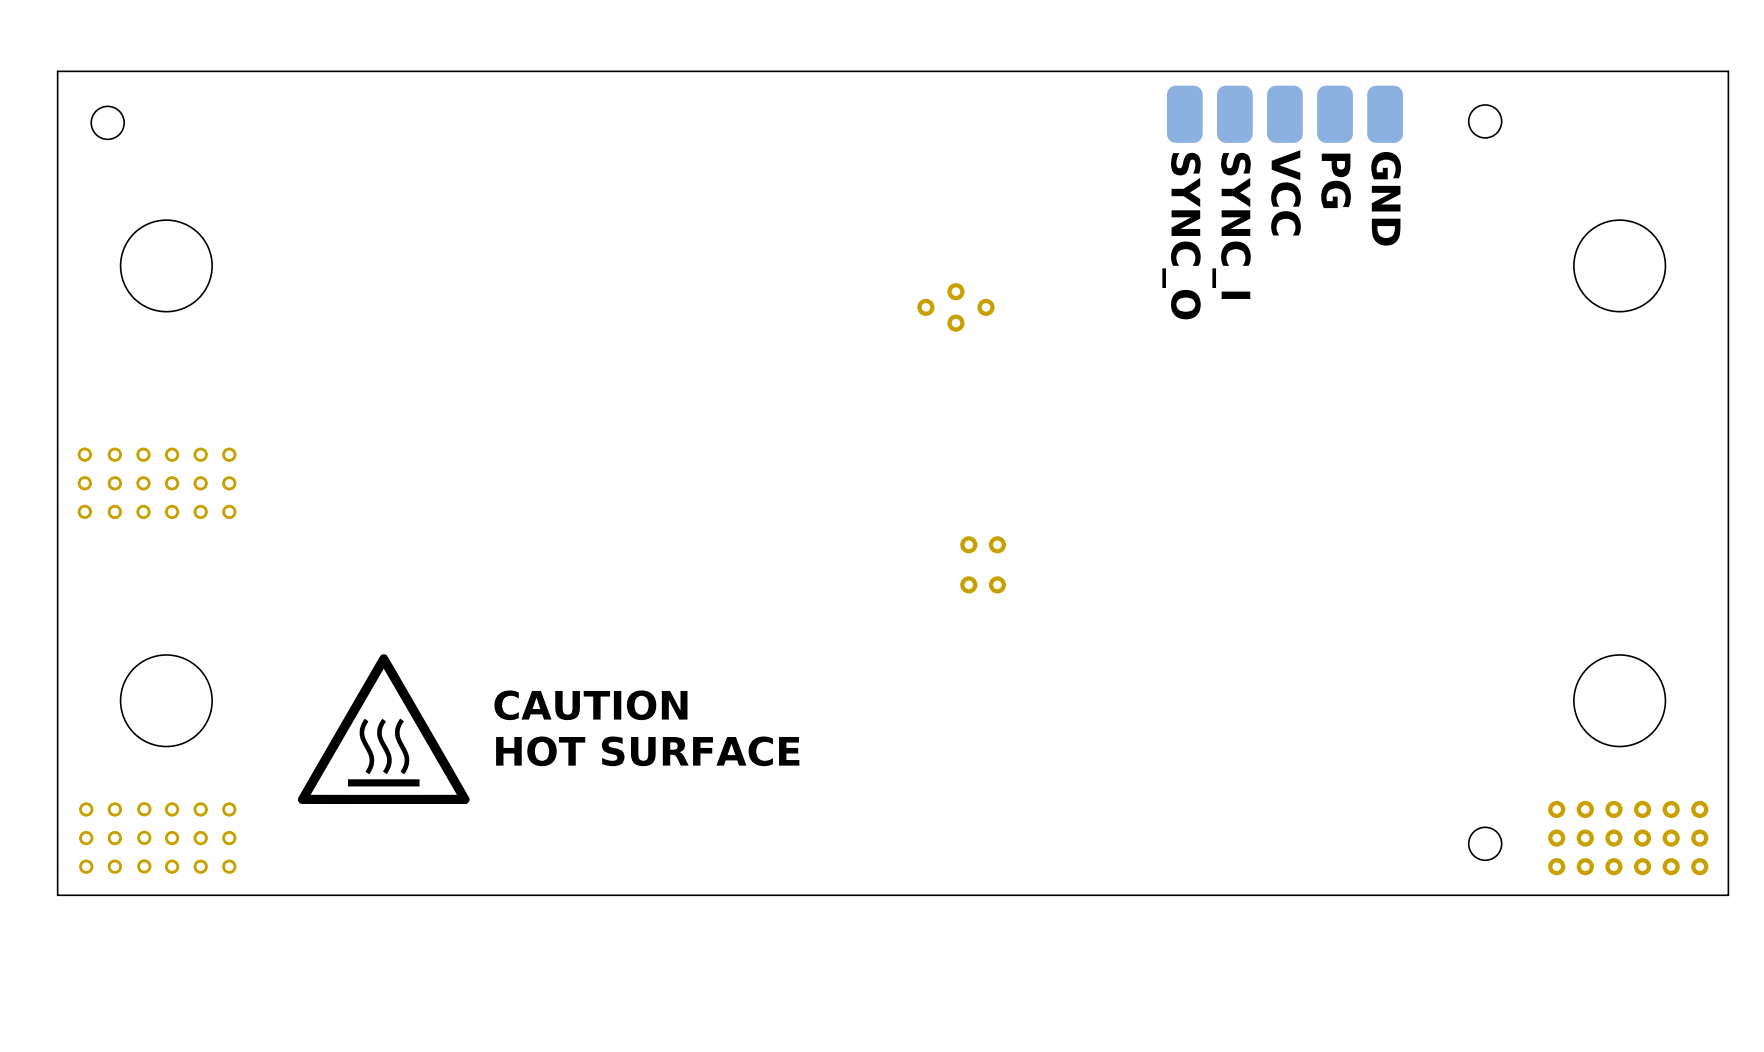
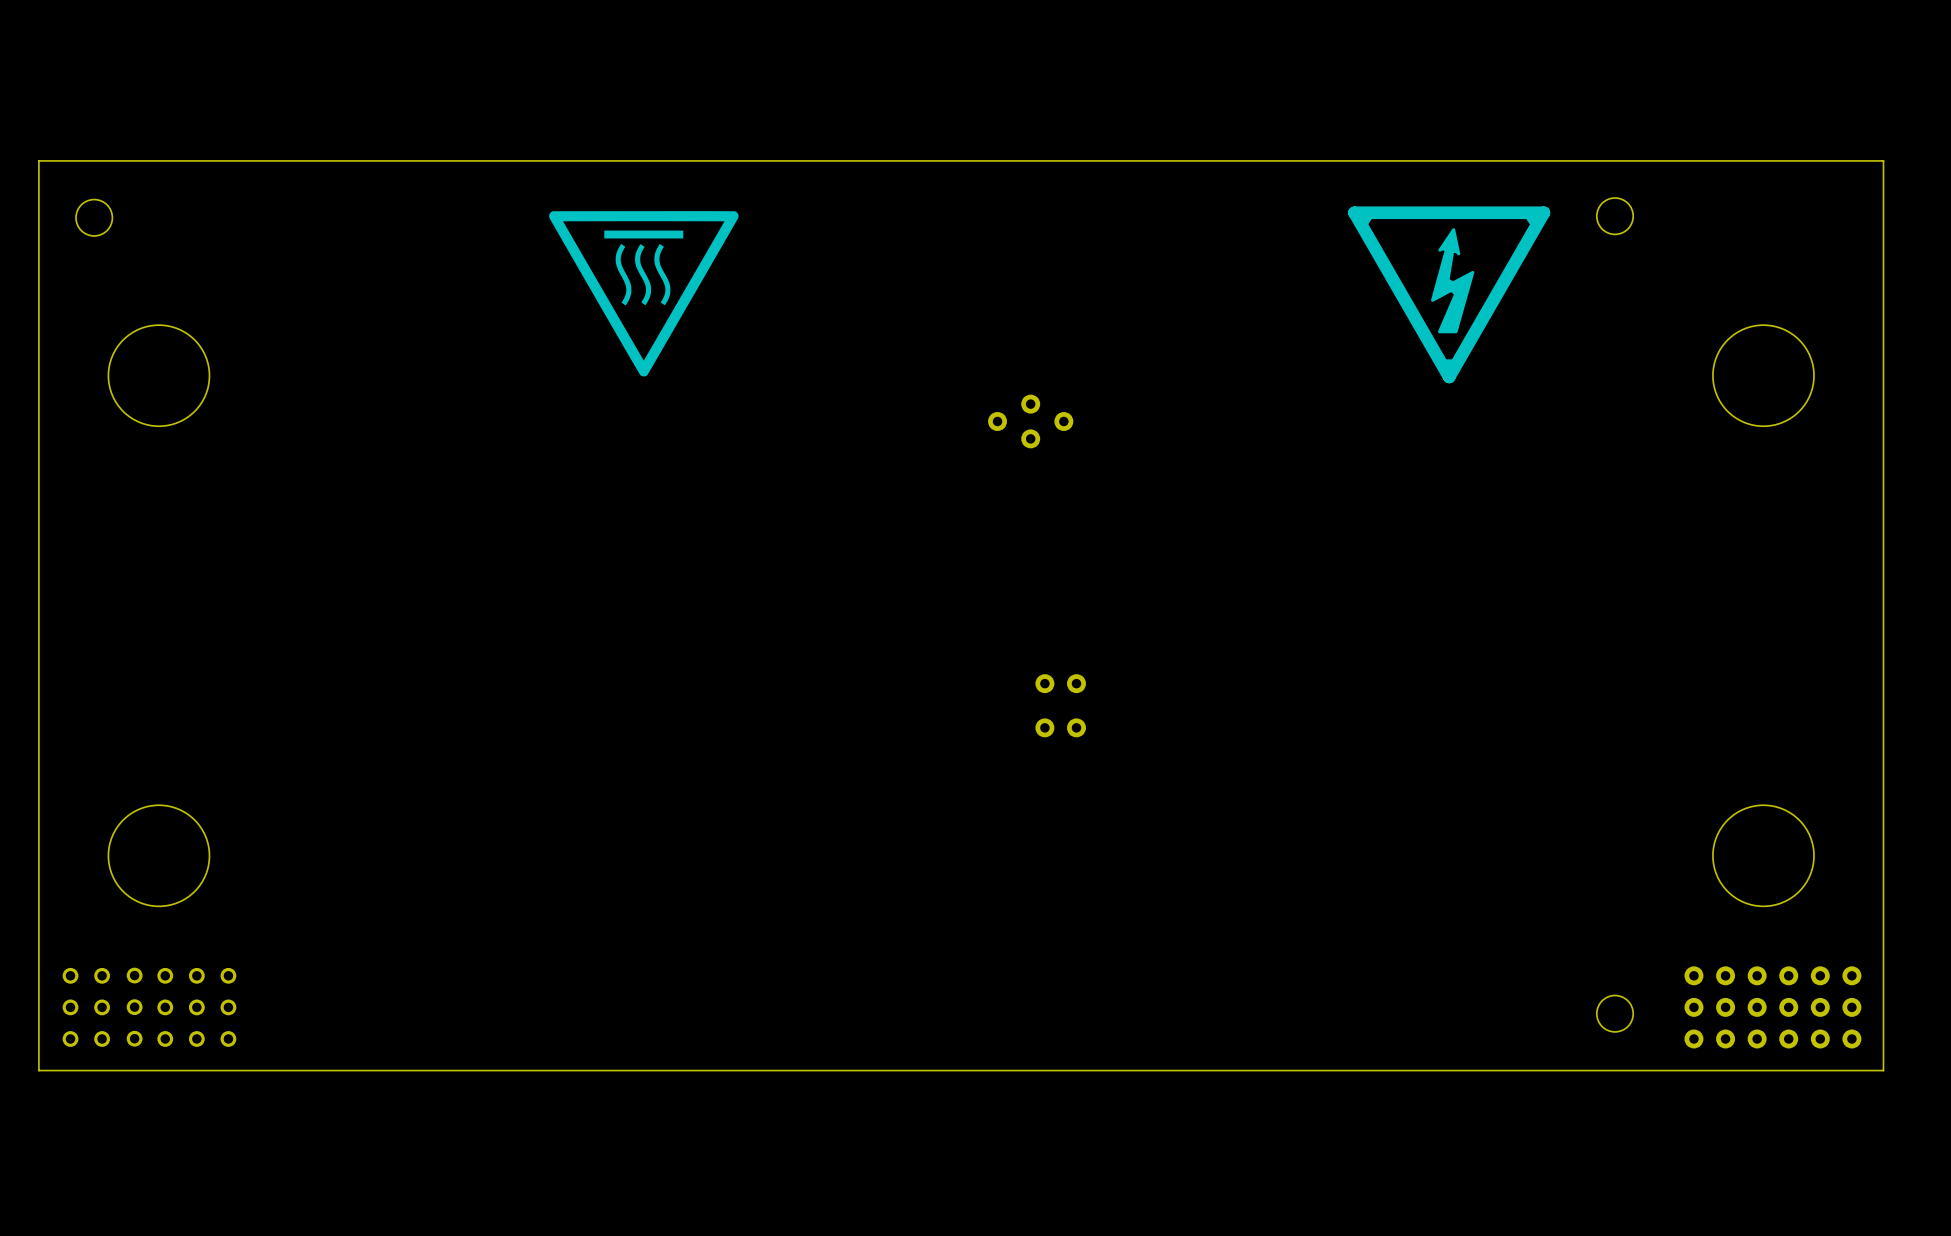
drawing: none -> [1348, 206, 1551, 384]
part: (1284, 114) -> none
drawing: none -> [549, 211, 739, 377]
text: PG (1336, 180) -> none
text: VCC (1285, 192) -> none
text: GND (1386, 198) -> none
text: SYNC_I (1231, 225) -> none
text: SYNC_O (1181, 236) -> none
part: (157, 483) -> none
drawing: [298, 654, 470, 805] -> none
text: CAUTION (590, 705) -> none
text: HOT SURFACE (647, 751) -> none

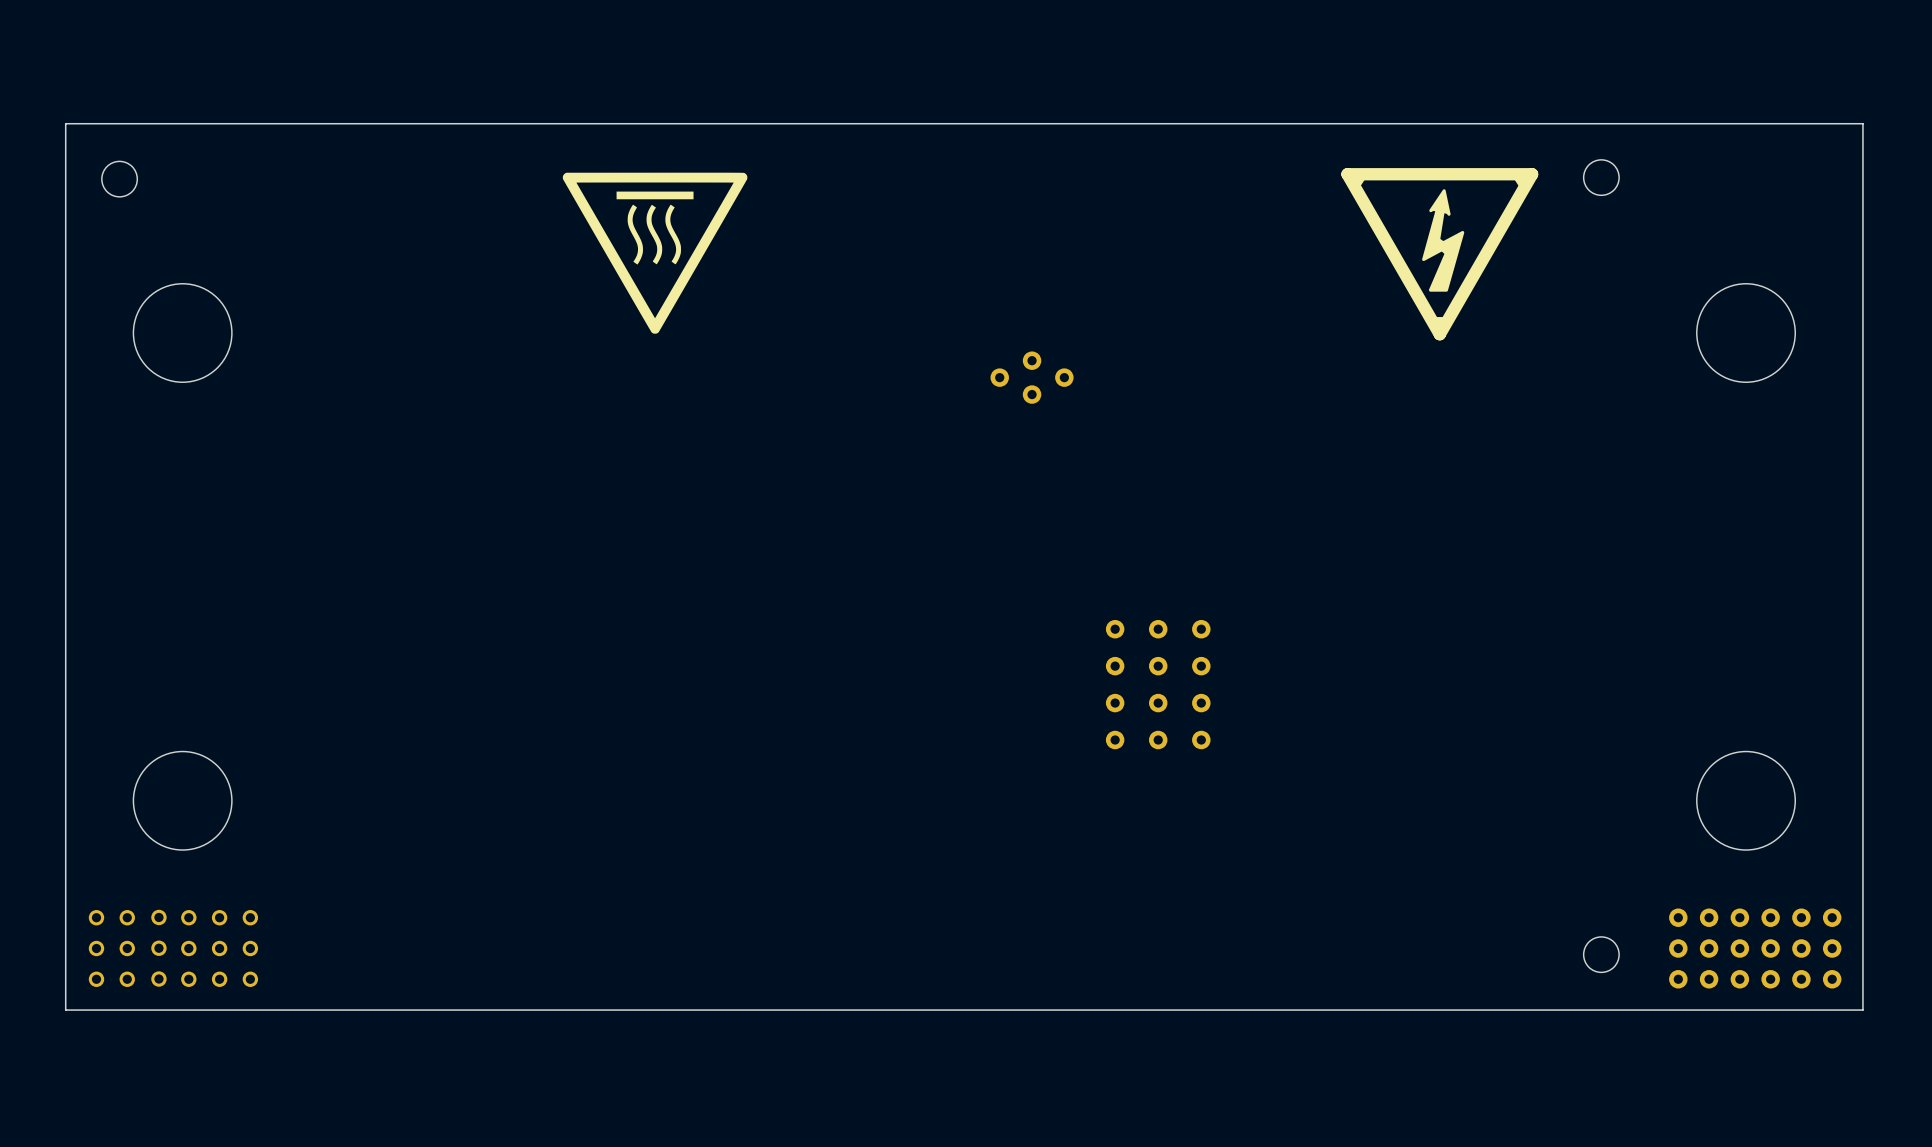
part: (1060, 705) -> none
part: none -> (1158, 684)

